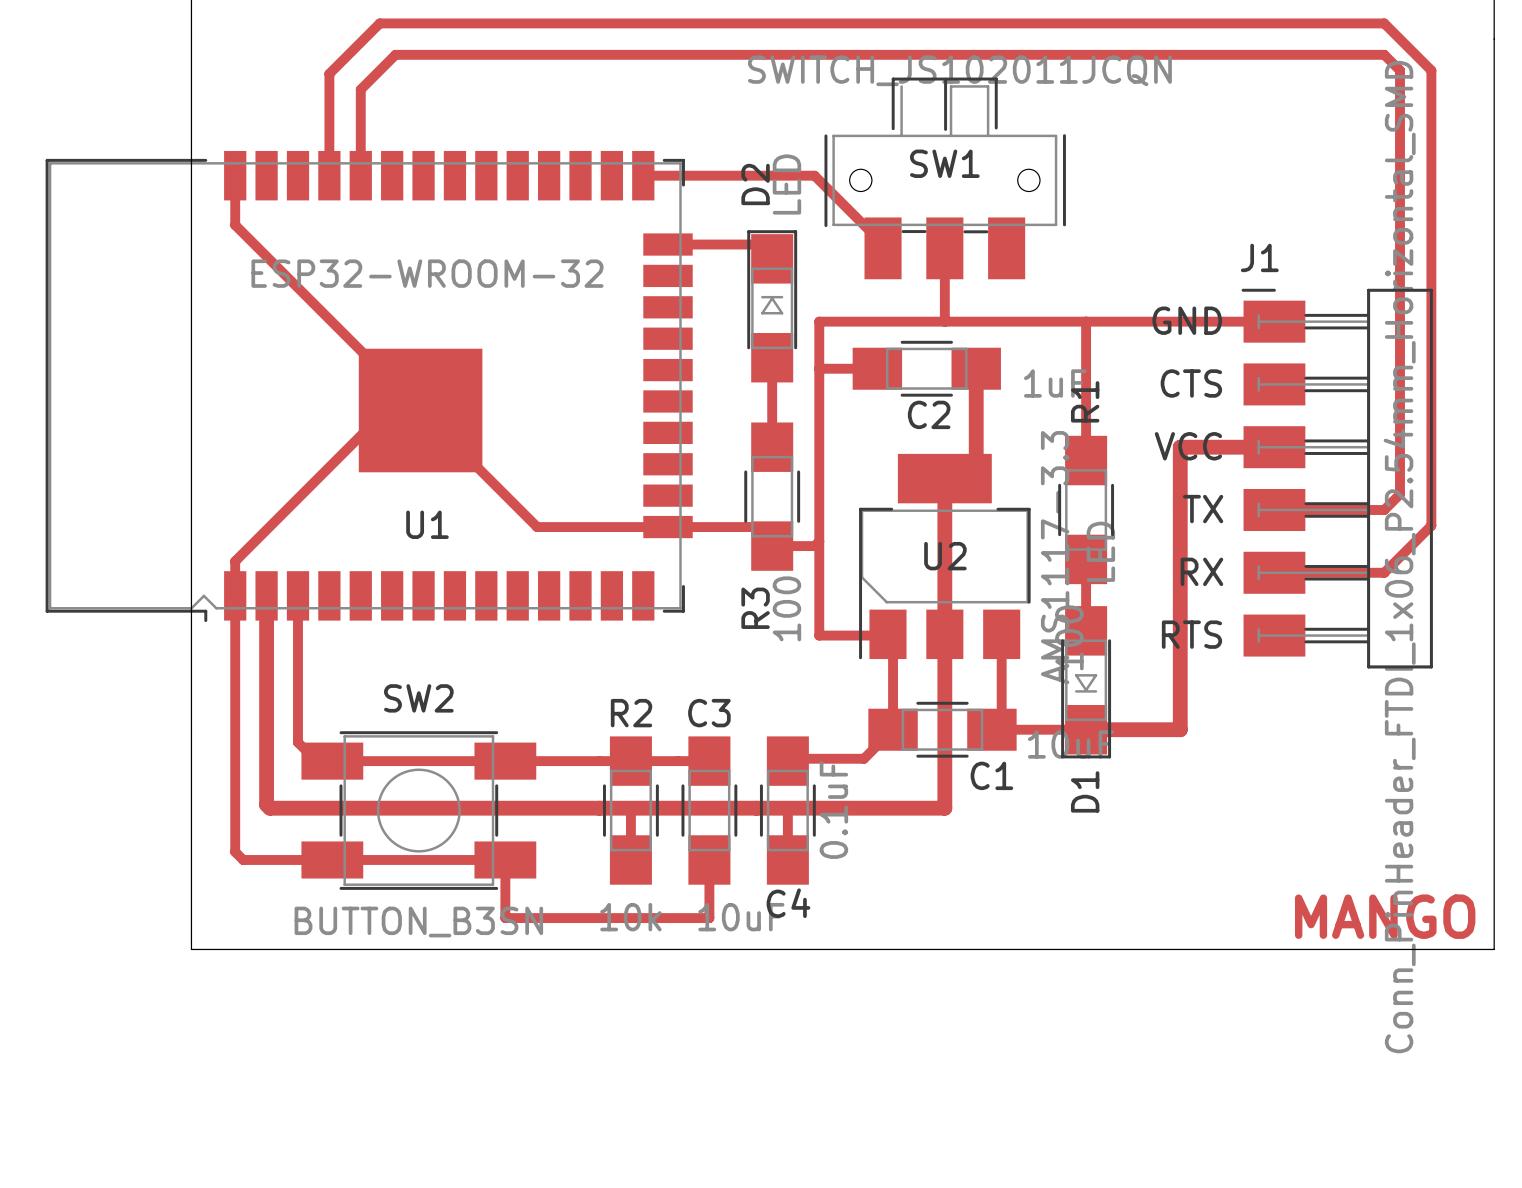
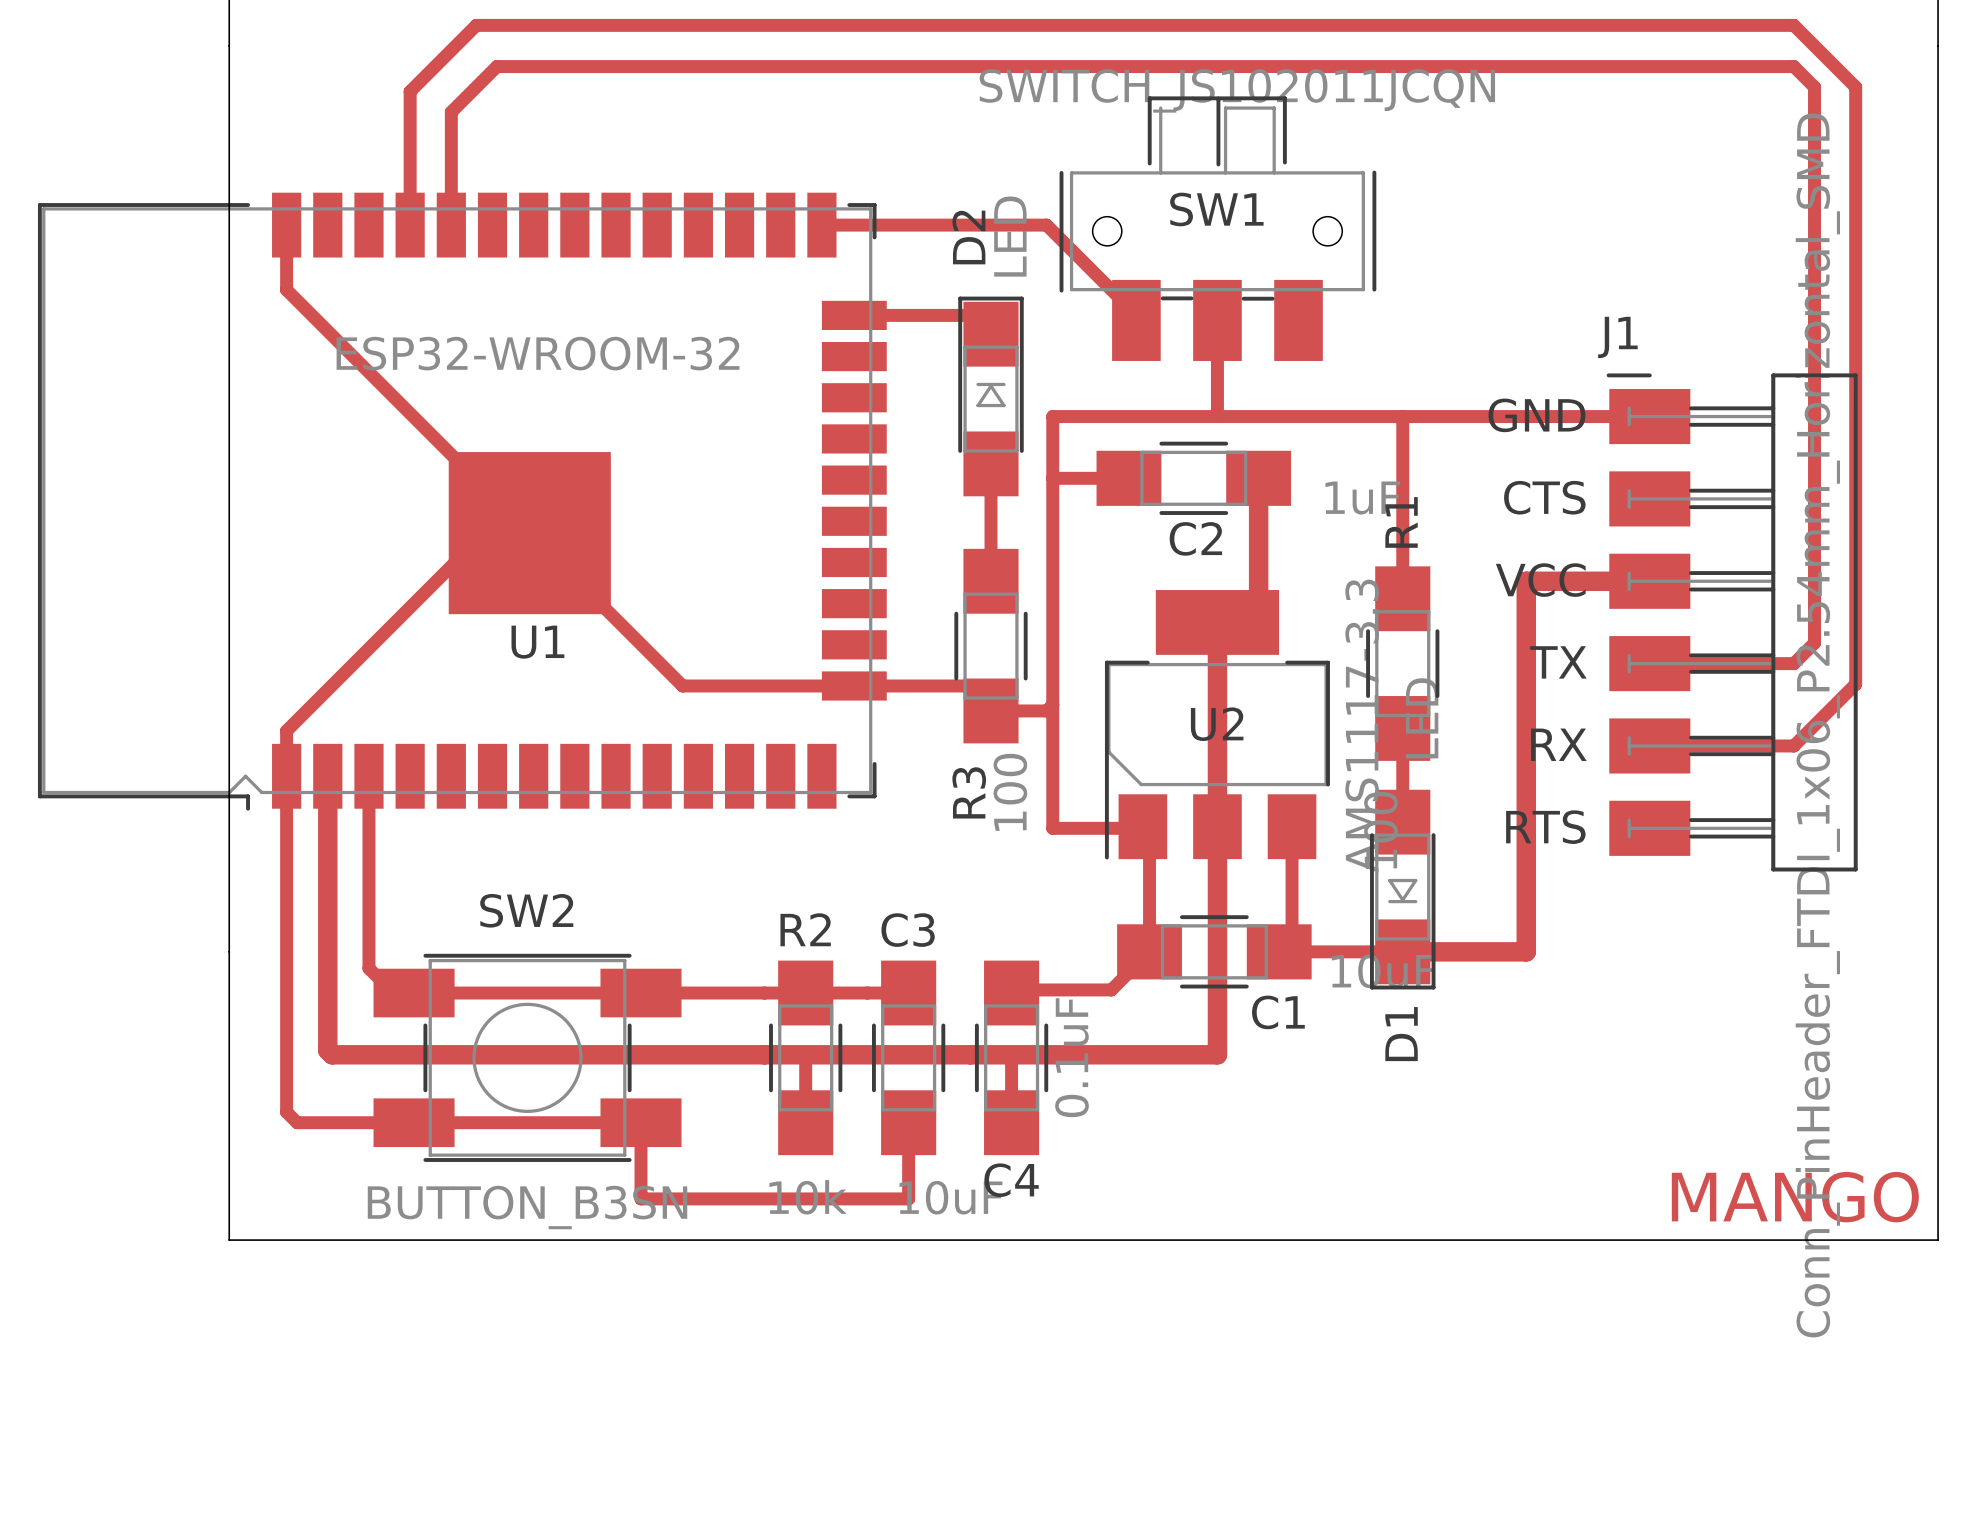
U1 name position: U1 (427, 524) -> U1 (537, 642)

